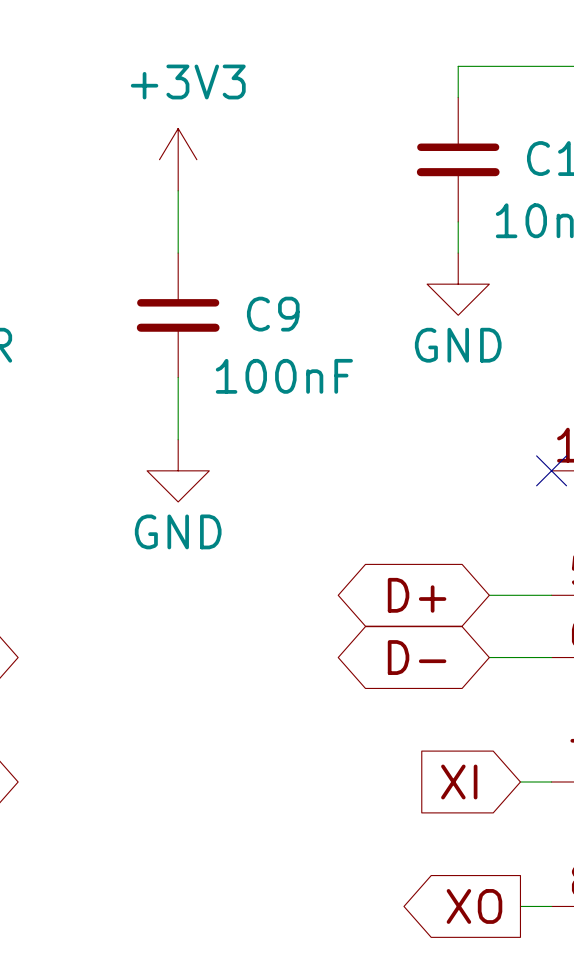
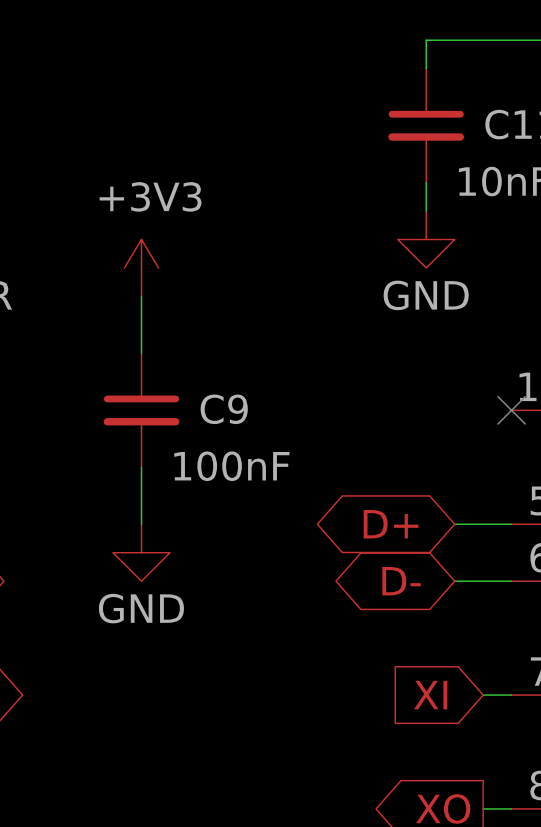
power symbol position: +3V3 (178, 159) -> +3V3 (141, 267)
wire: (178, 190) (178, 253) -> (141, 296) (141, 353)
C9 position: (178, 315) -> (141, 410)
wire: (178, 377) (178, 439) -> (141, 467) (141, 524)
power symbol position: GND (178, 470) -> GND (141, 552)

